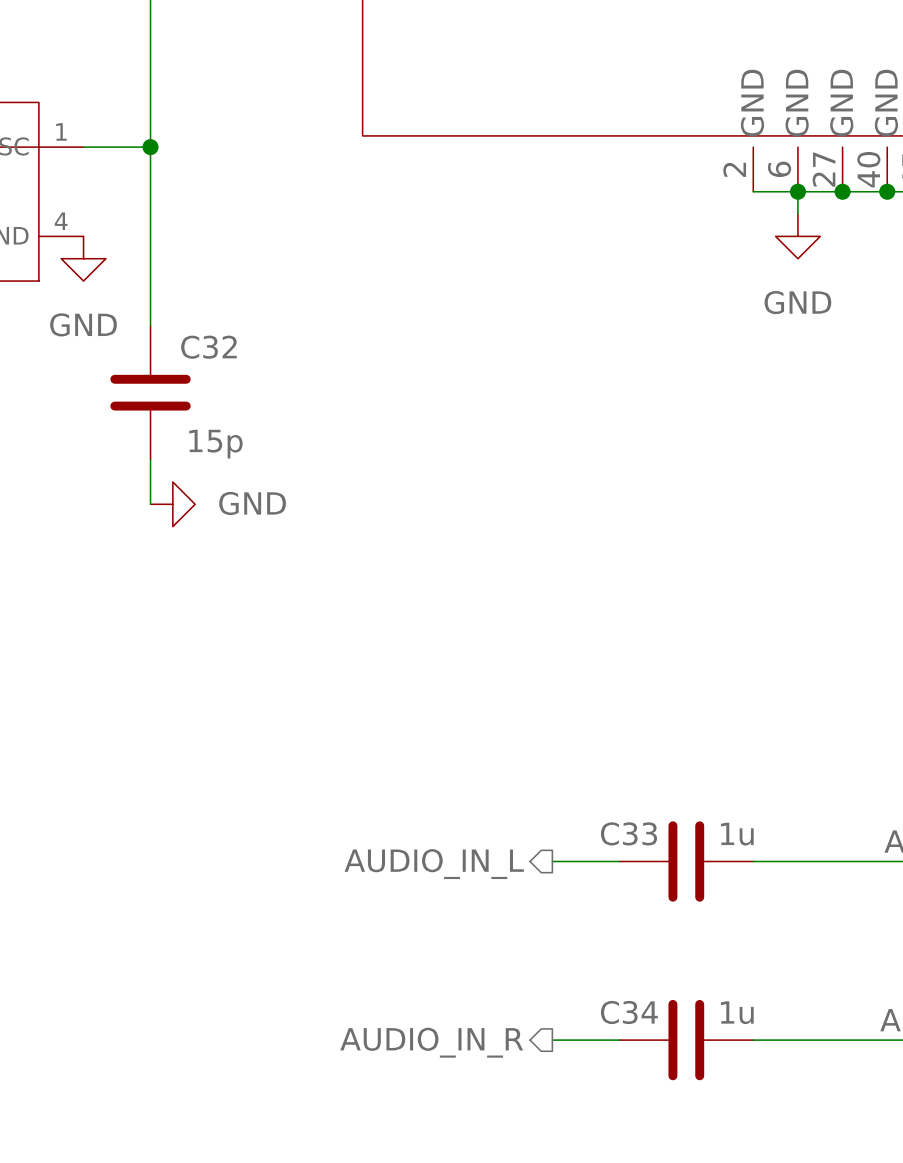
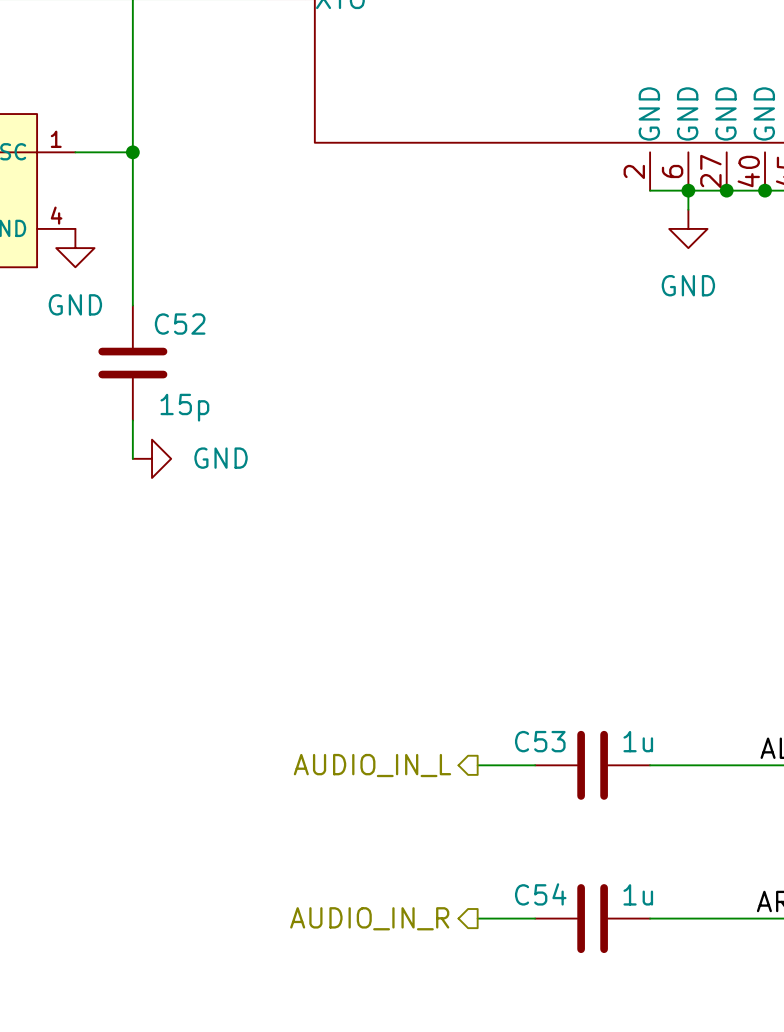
C32 name: C32 (208, 347) -> C52 (180, 324)
C33 name: C33 (628, 833) -> C53 (540, 741)
C34 name: C34 (629, 1012) -> C54 (540, 894)

